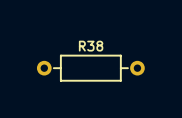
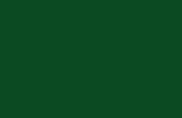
R38: (90, 68) -> none

